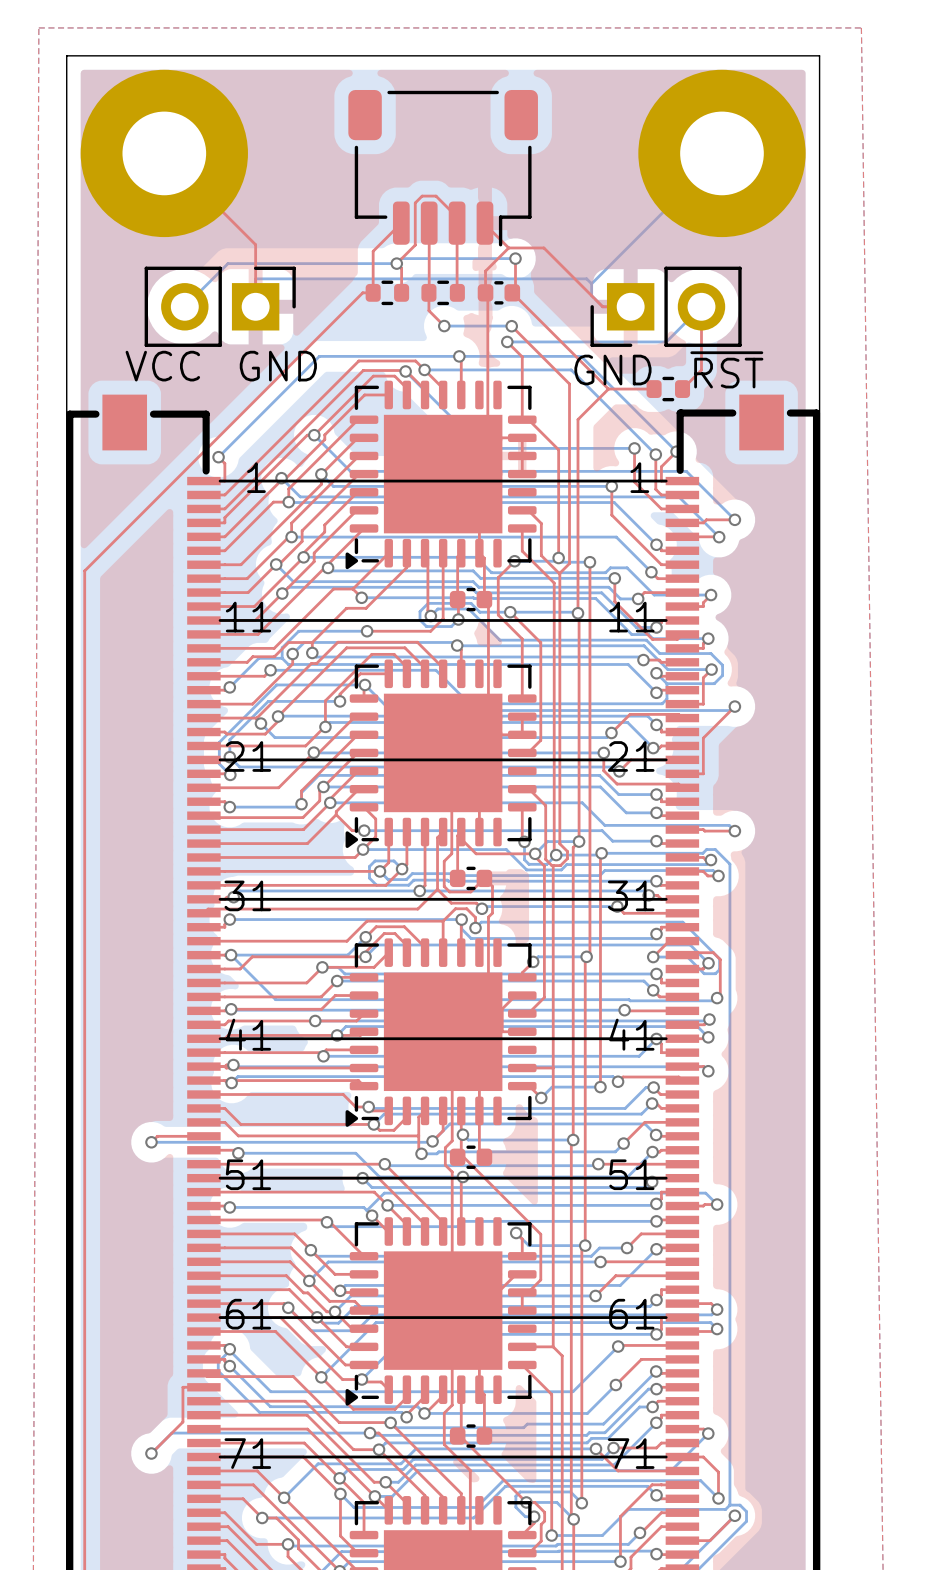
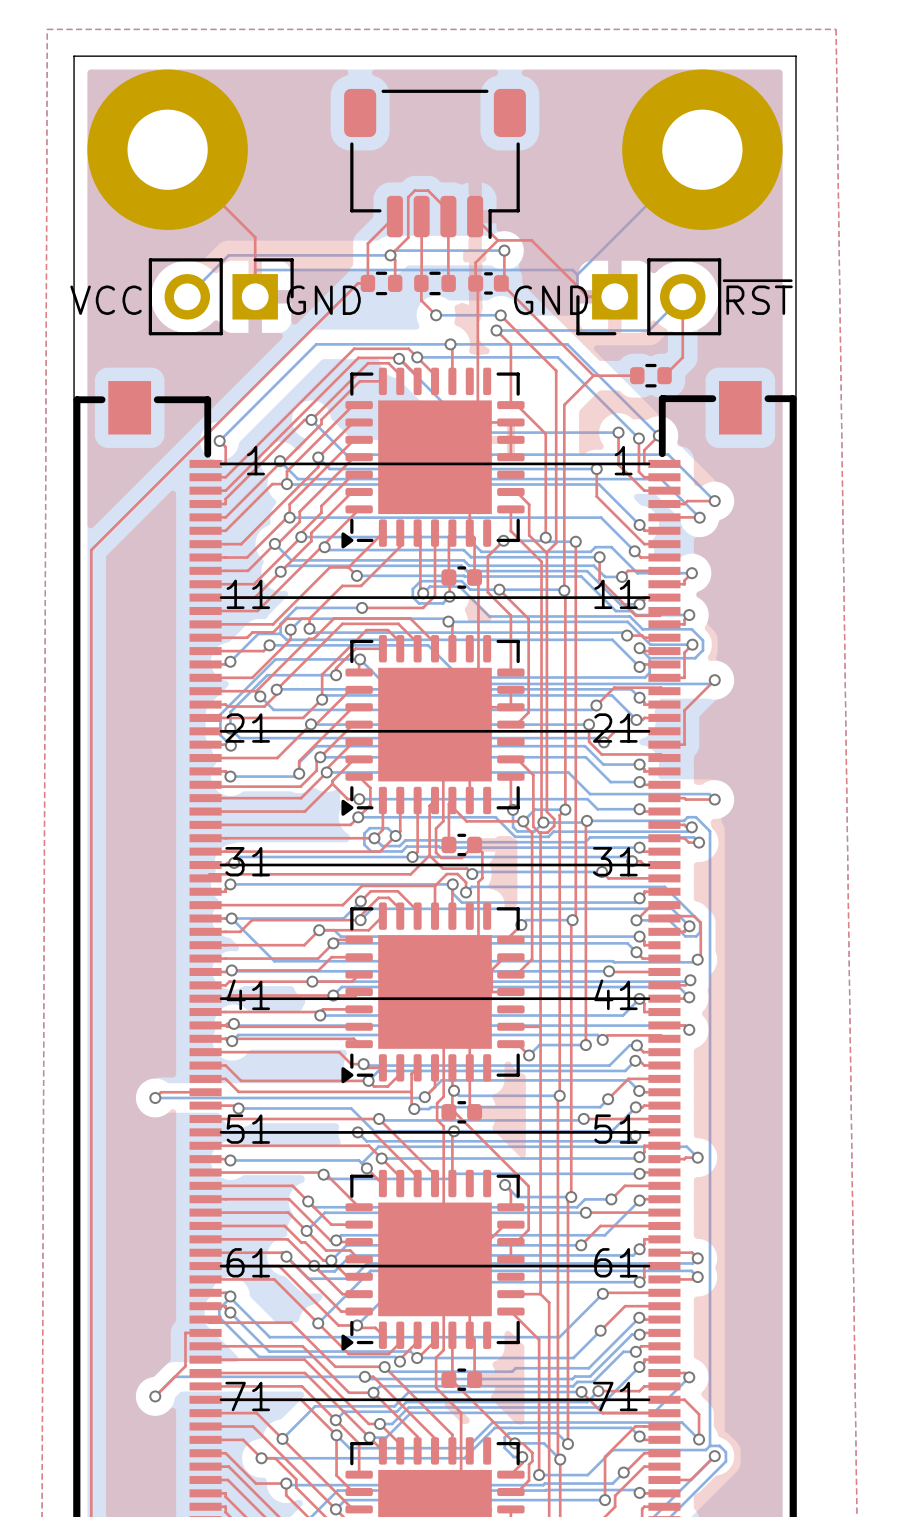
text position: VCC (162, 366) -> VCC (106, 300)
text position: GND (278, 366) -> GND (323, 300)
text position: ~{RST} (726, 369) -> ~{RST} (757, 297)
text position: GND (612, 370) -> GND (551, 300)

